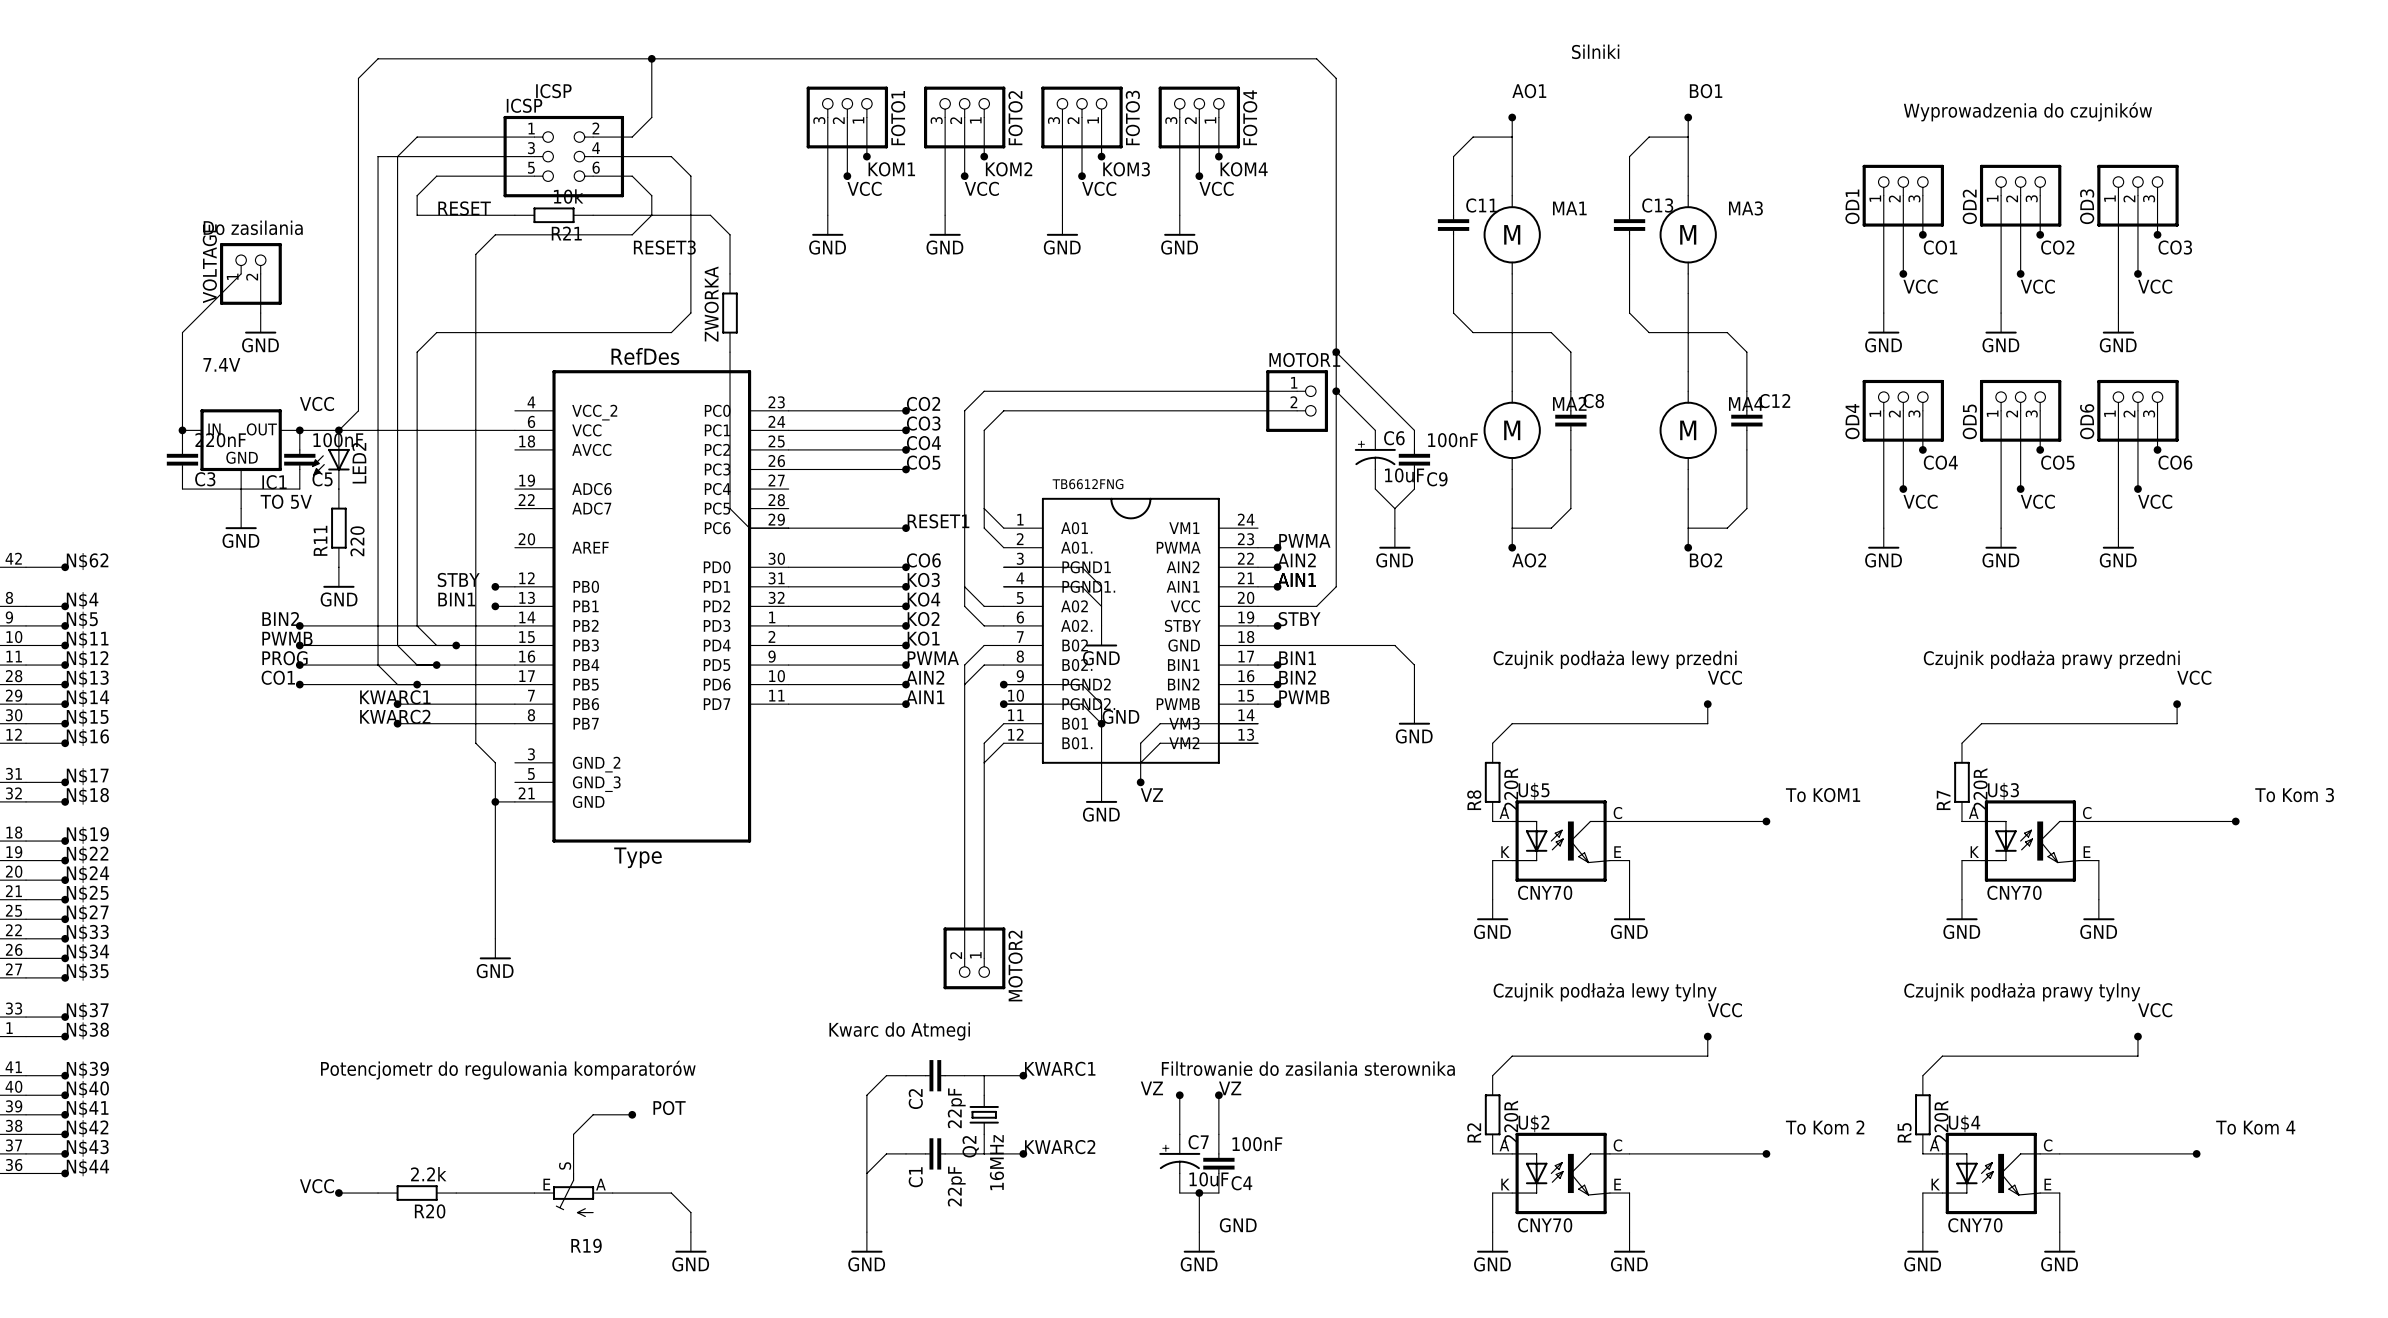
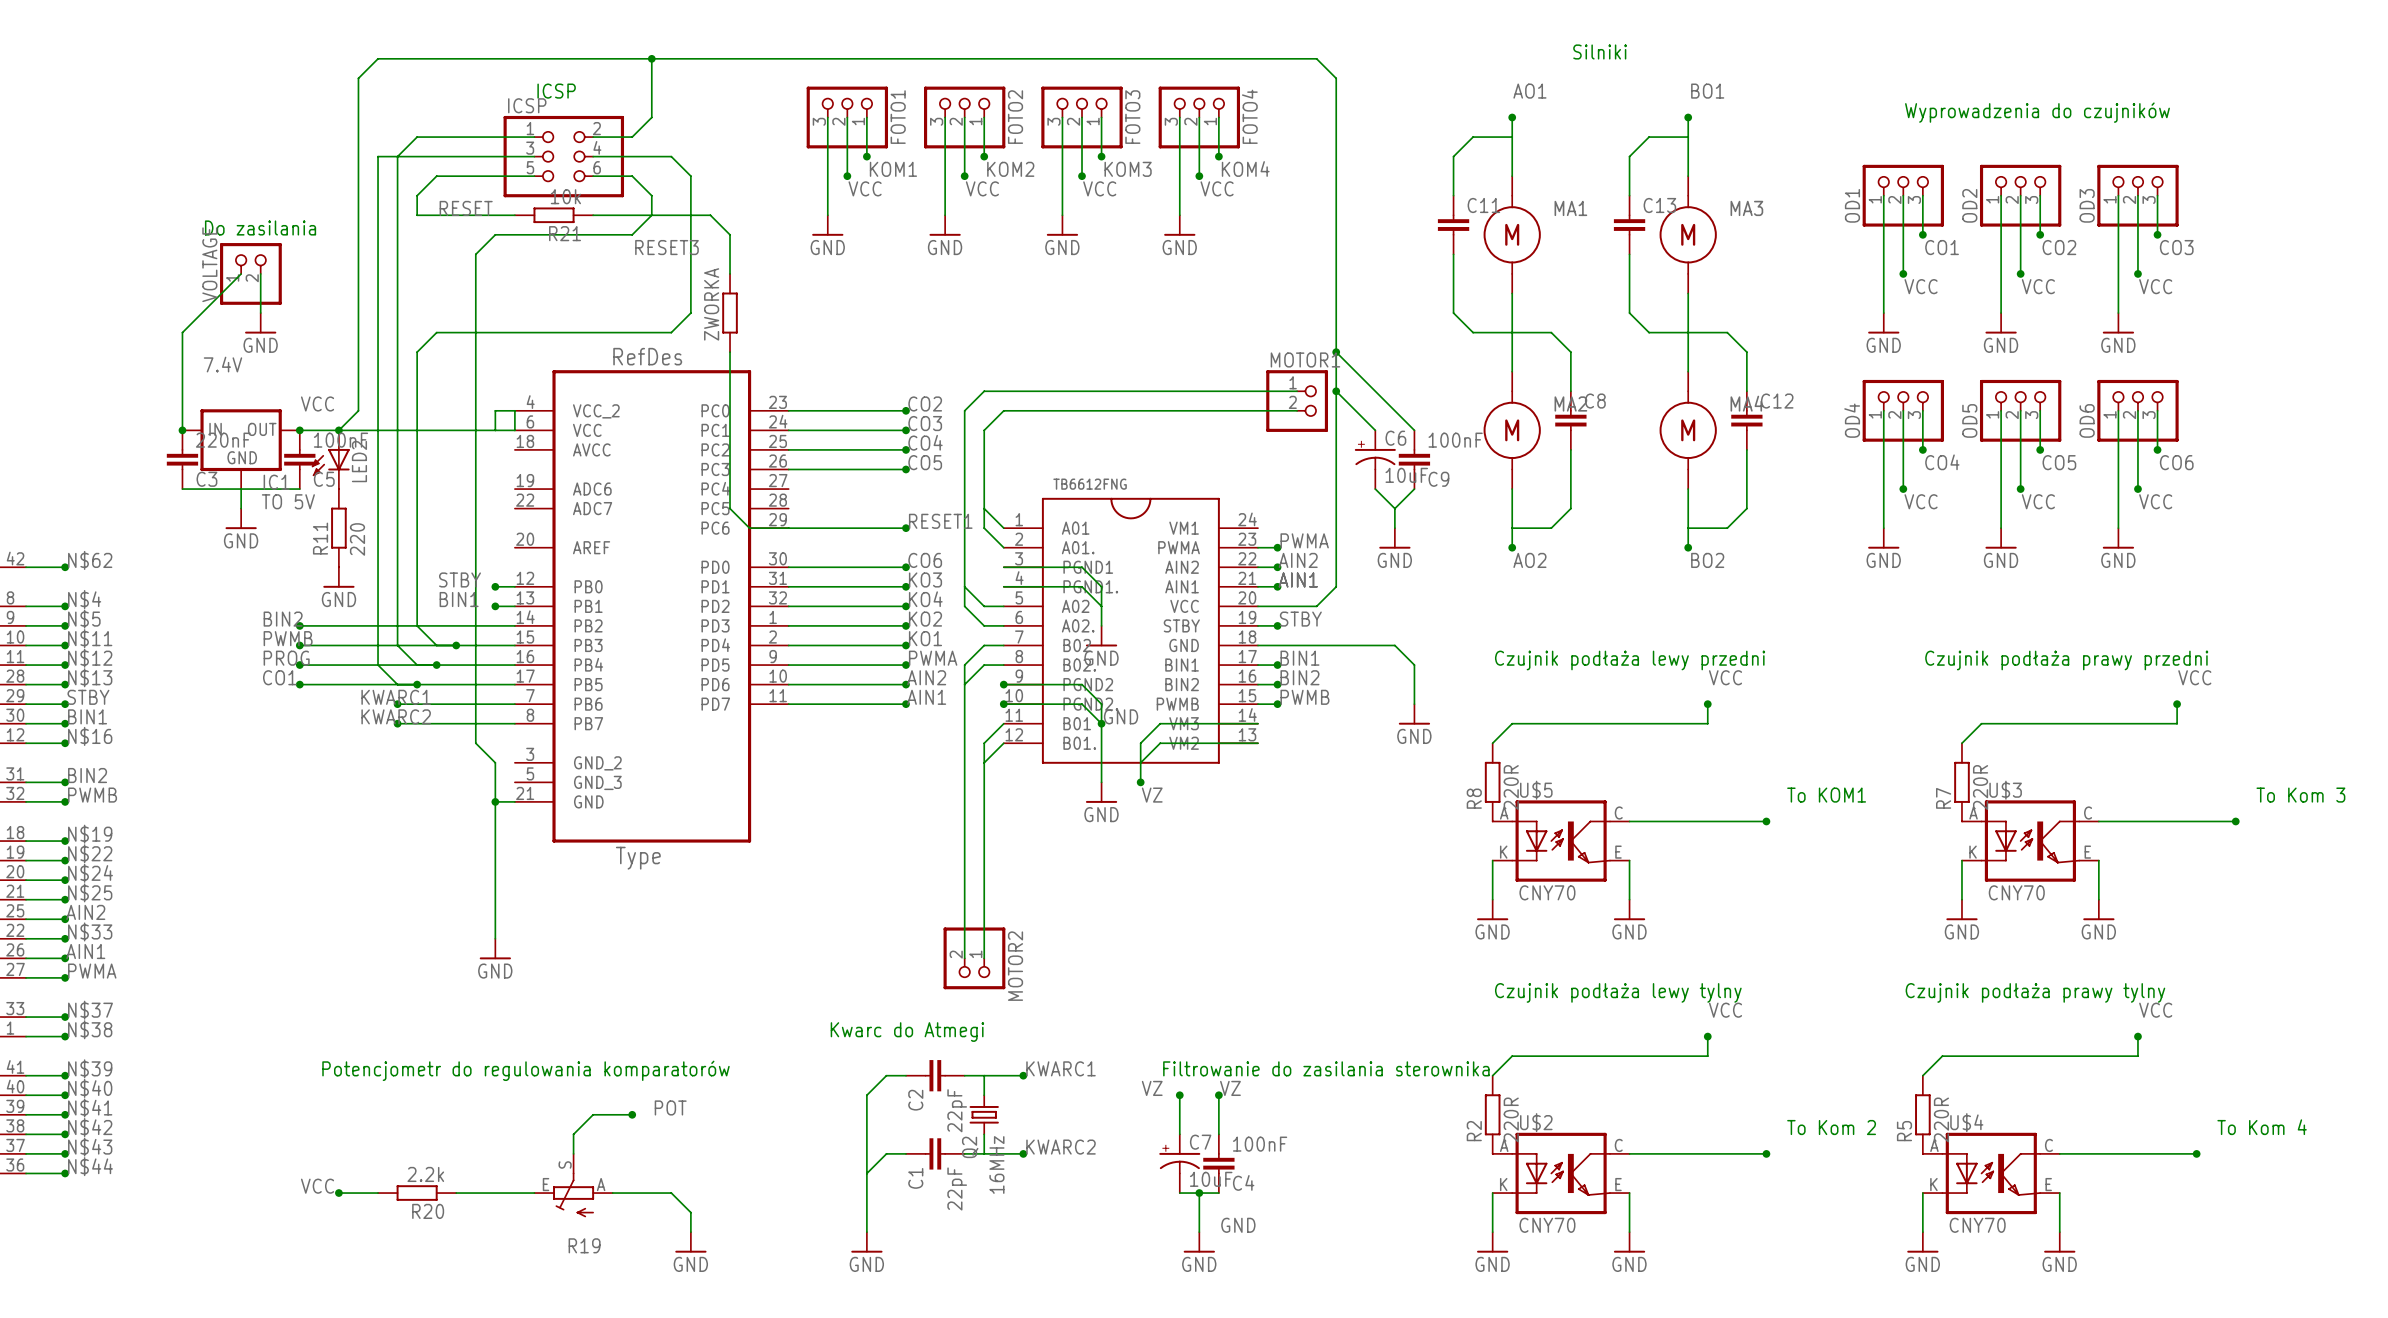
wire: none -> (495, 430) (495, 410) (514, 410) (514, 430)
label: N$14 (87, 698) -> STBY (88, 697)
label: N$15 (87, 717) -> BIN1 (87, 716)
label: N$17 (87, 776) -> BIN2 (87, 775)
label: N$18 (87, 796) -> PWMB (92, 795)
label: N$27 (87, 913) -> AIN2 (85, 912)
label: N$34 (87, 952) -> AIN1 (85, 951)
label: N$35 (87, 972) -> PWMA (92, 971)

